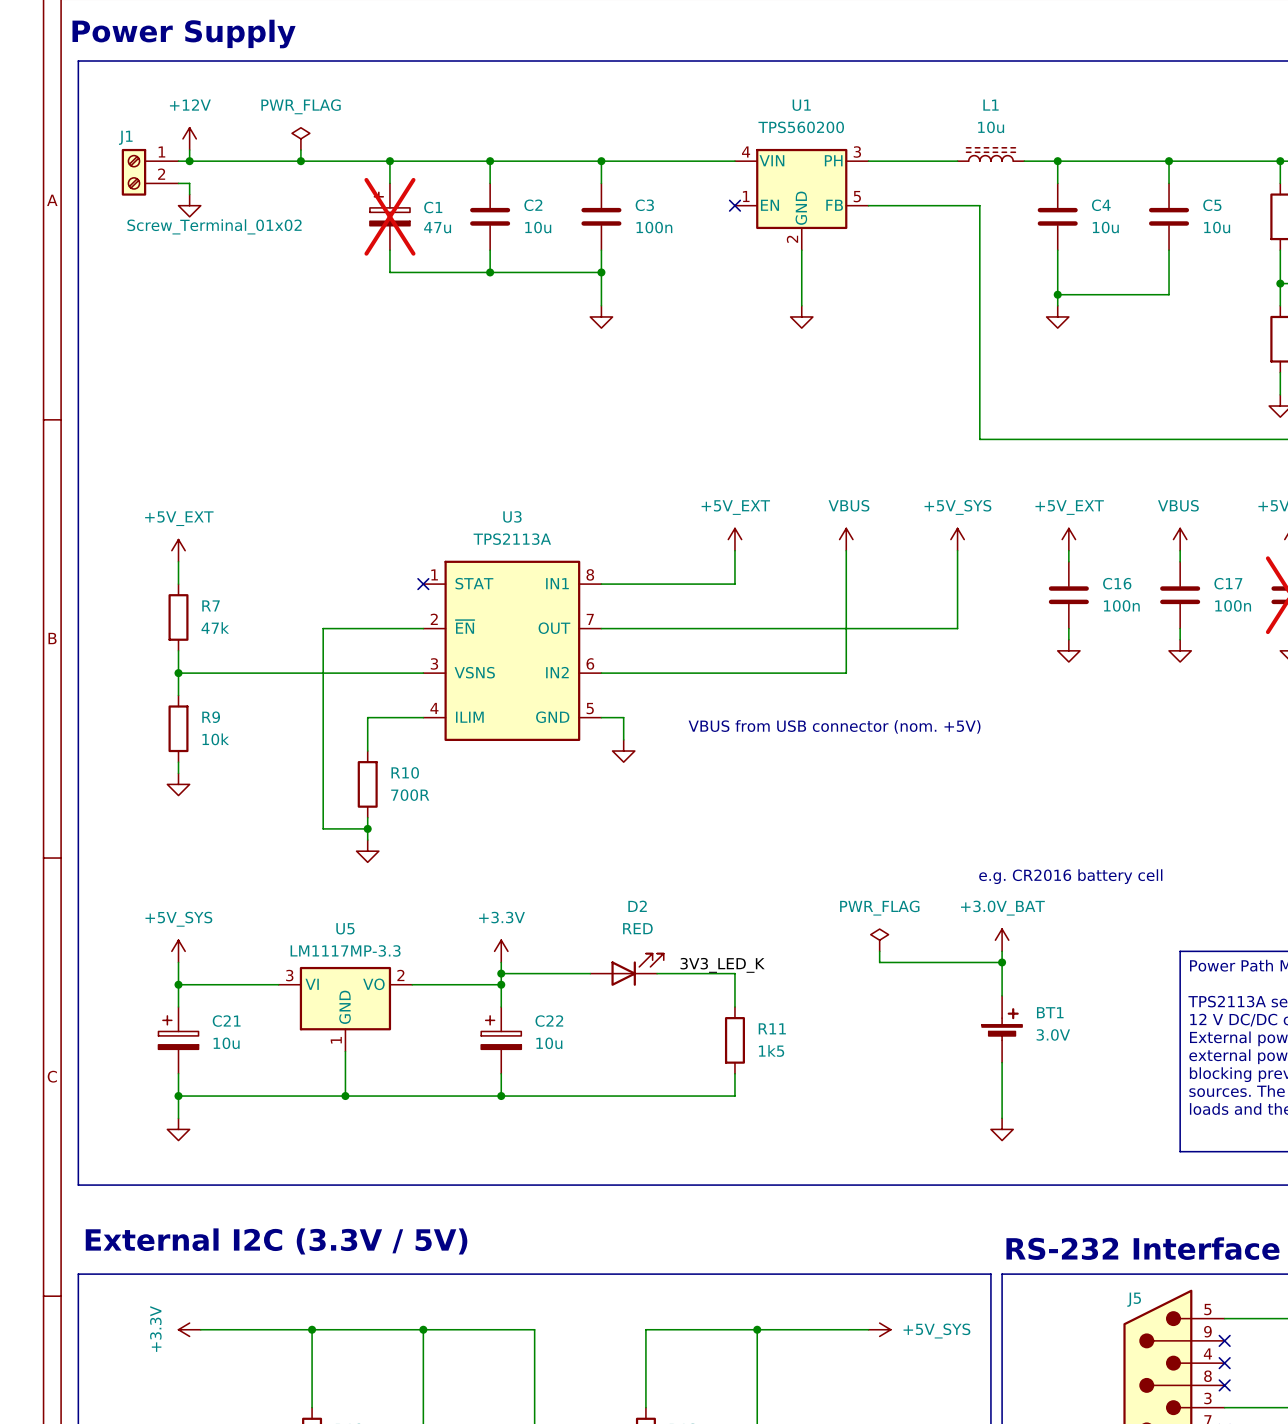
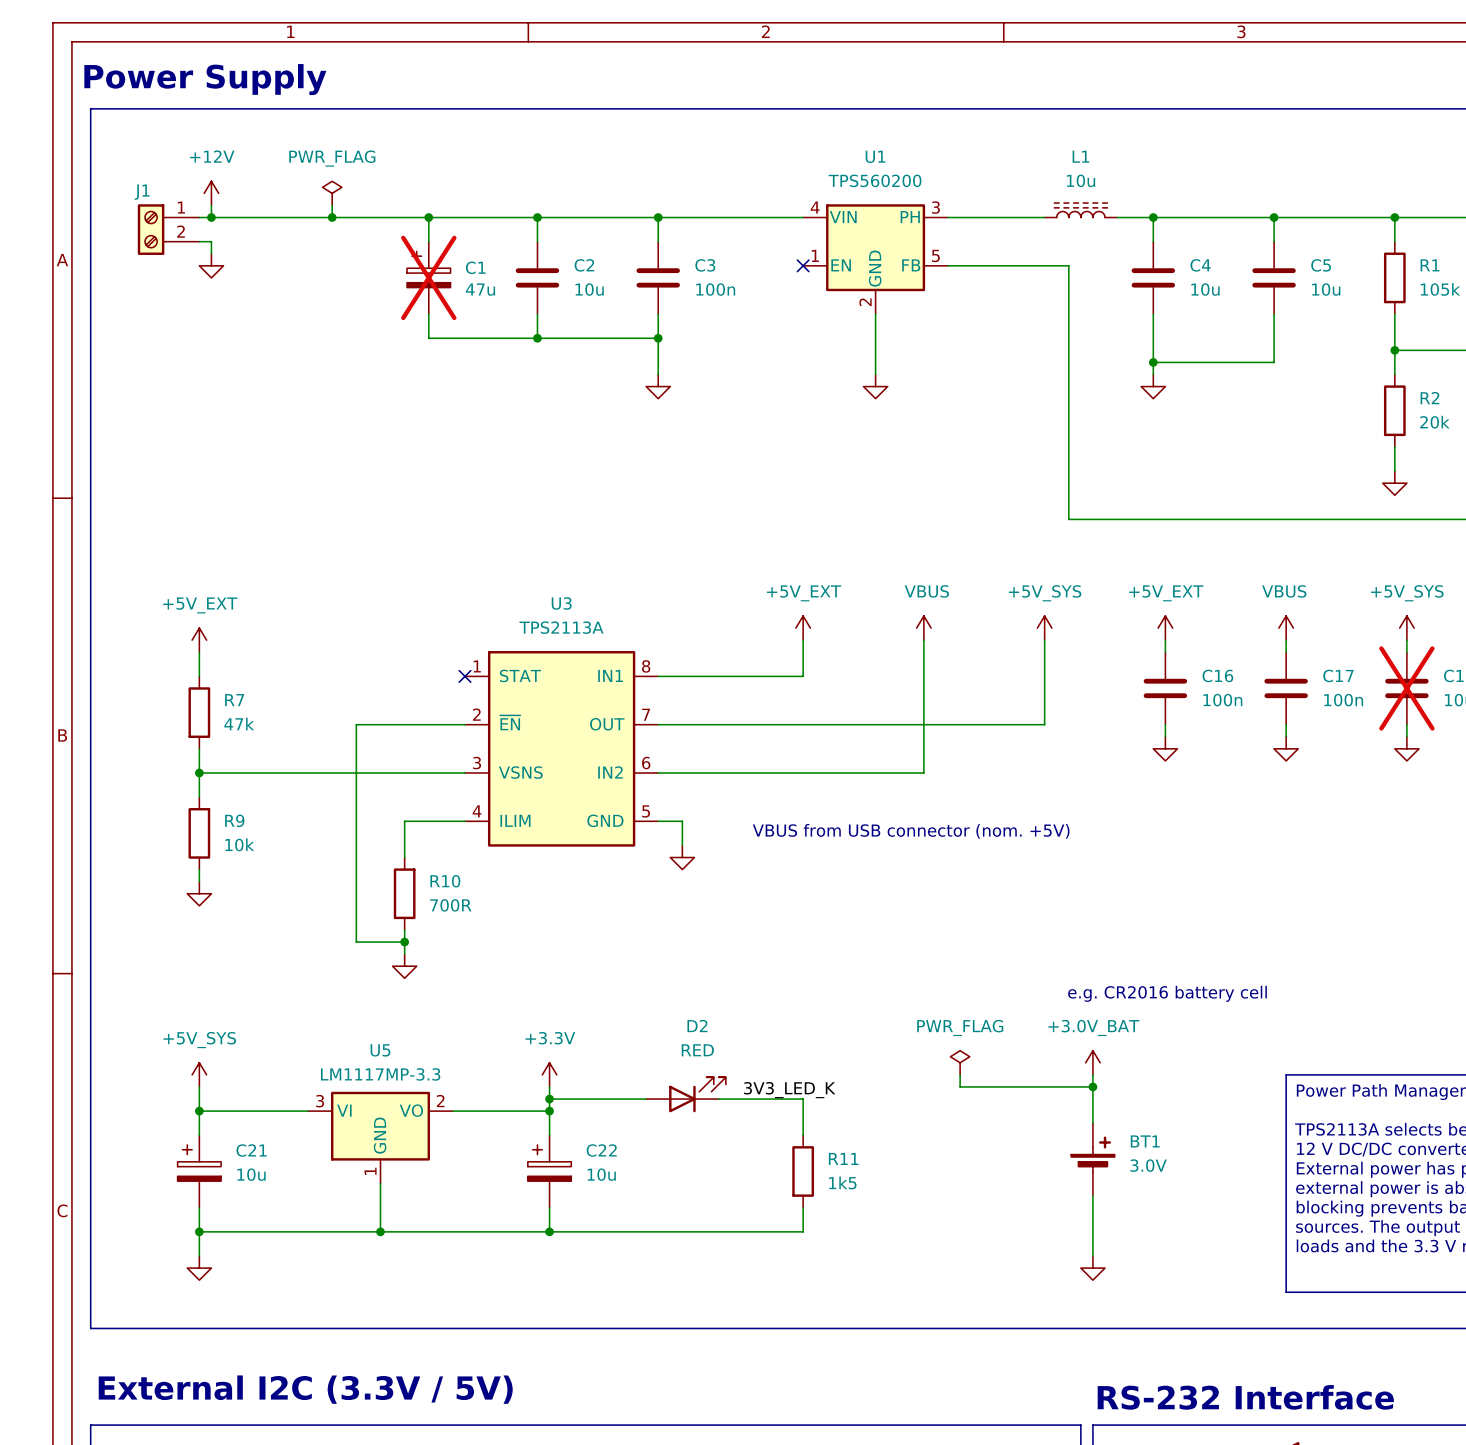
J1 value: Screw_Terminal_01x02 (214, 226) -> none

